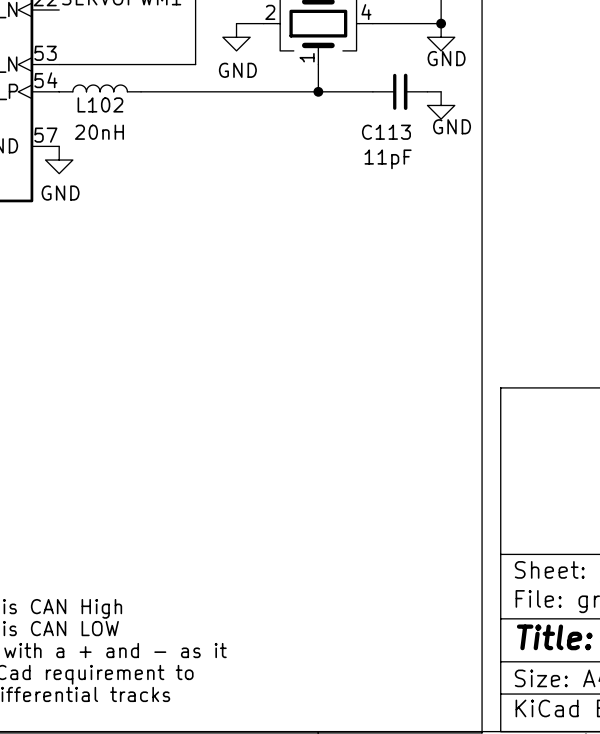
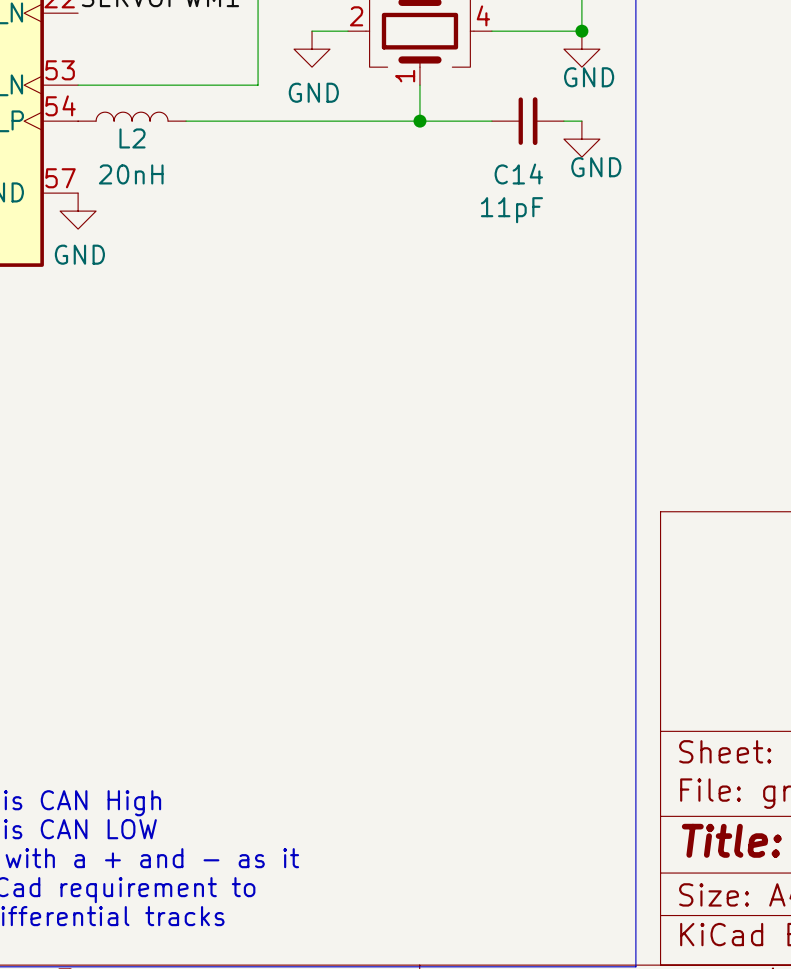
L102 name: L102 (100, 104) -> L2 (132, 138)
C113 name: C113 (386, 132) -> C14 (518, 174)

